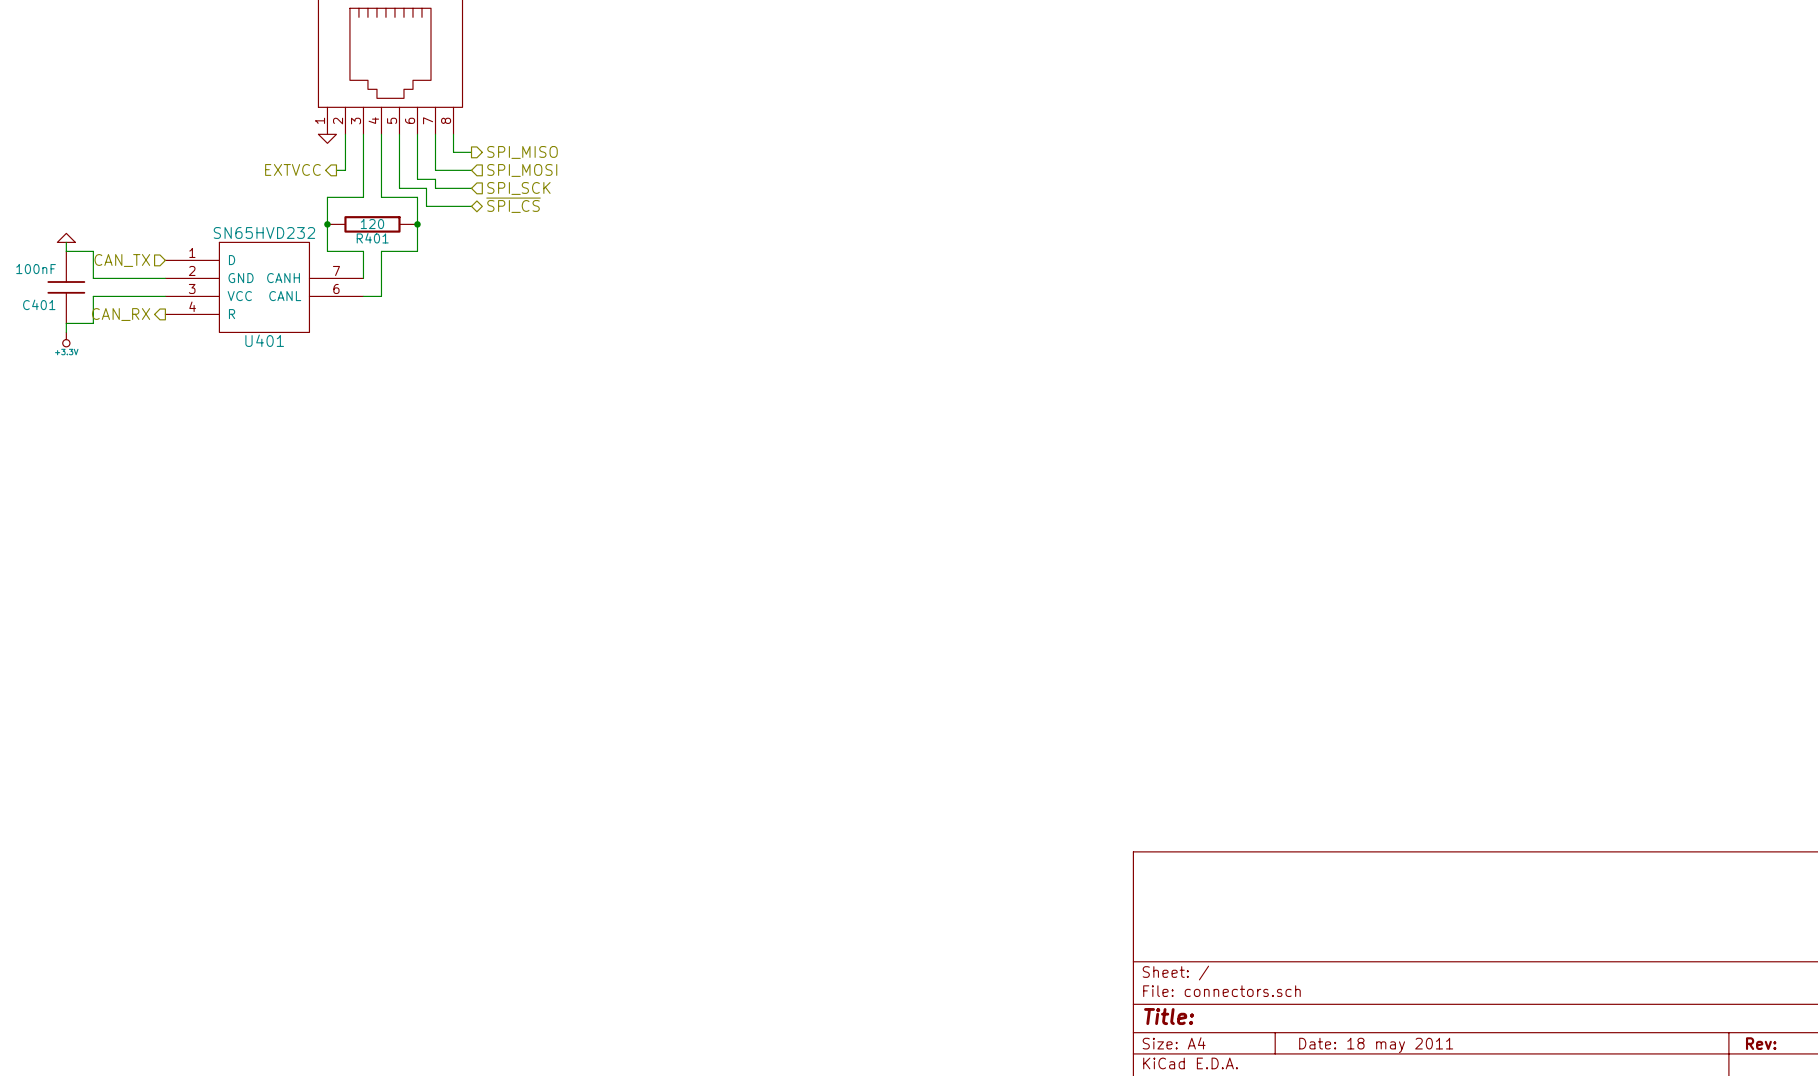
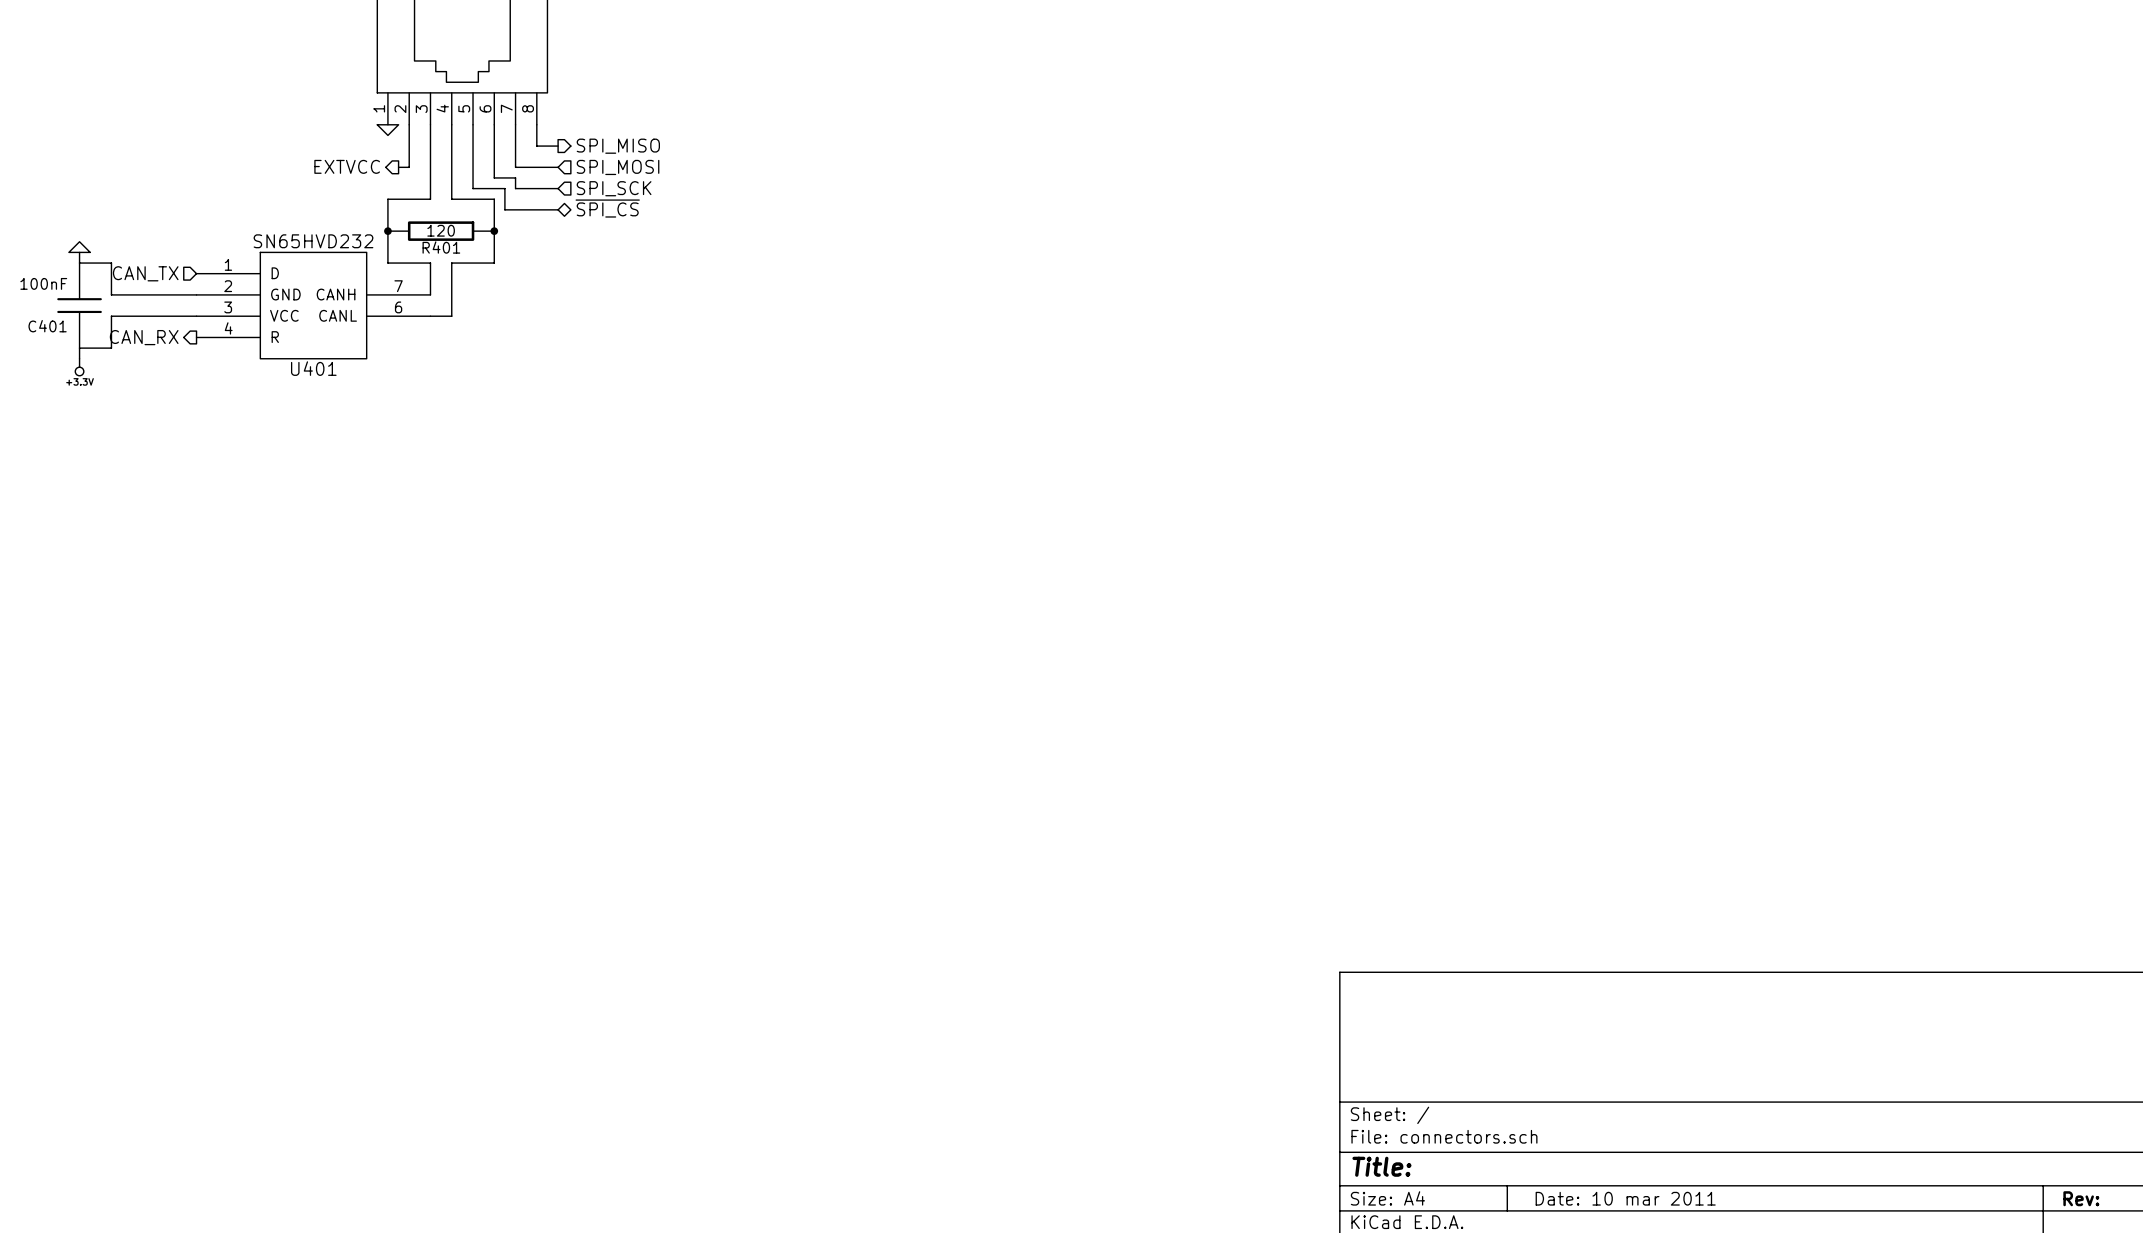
title block: Date: 18 may 2011 (1376, 1045) -> Date: 10 mar 2011 (1625, 1198)

